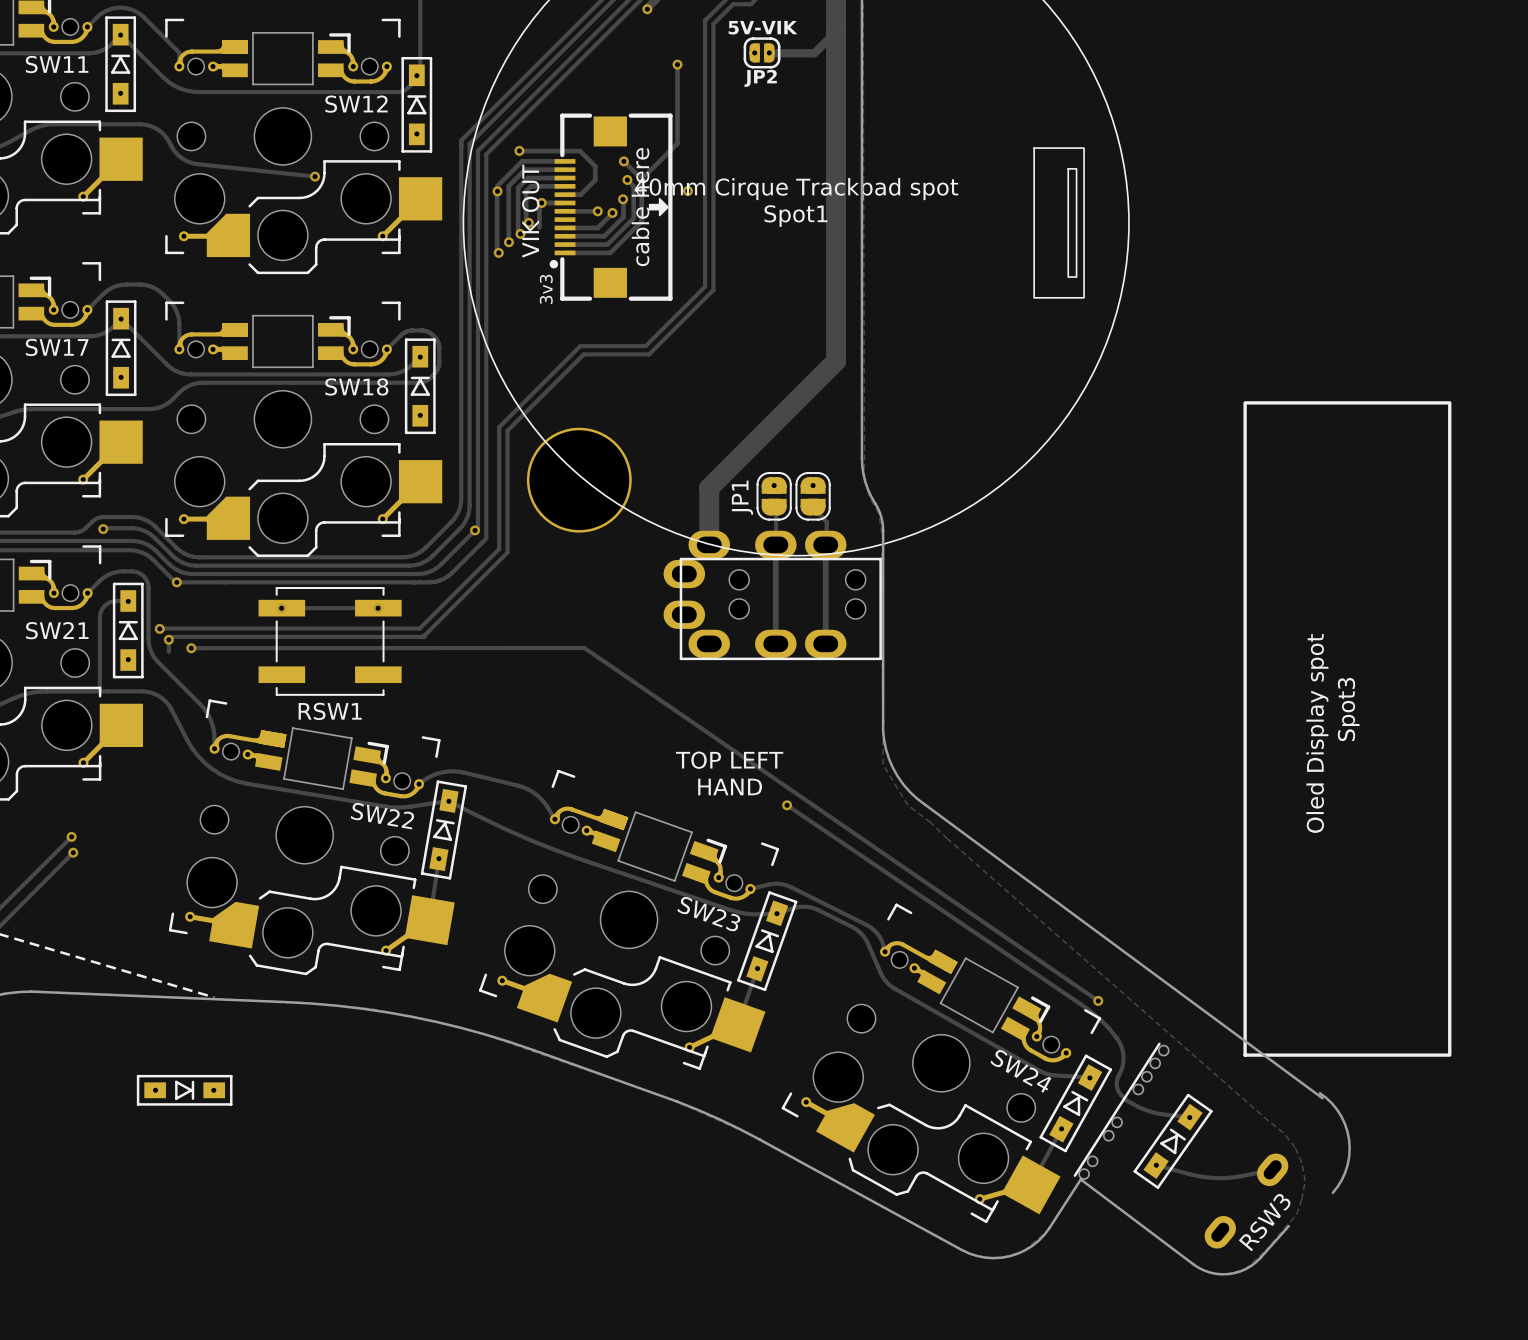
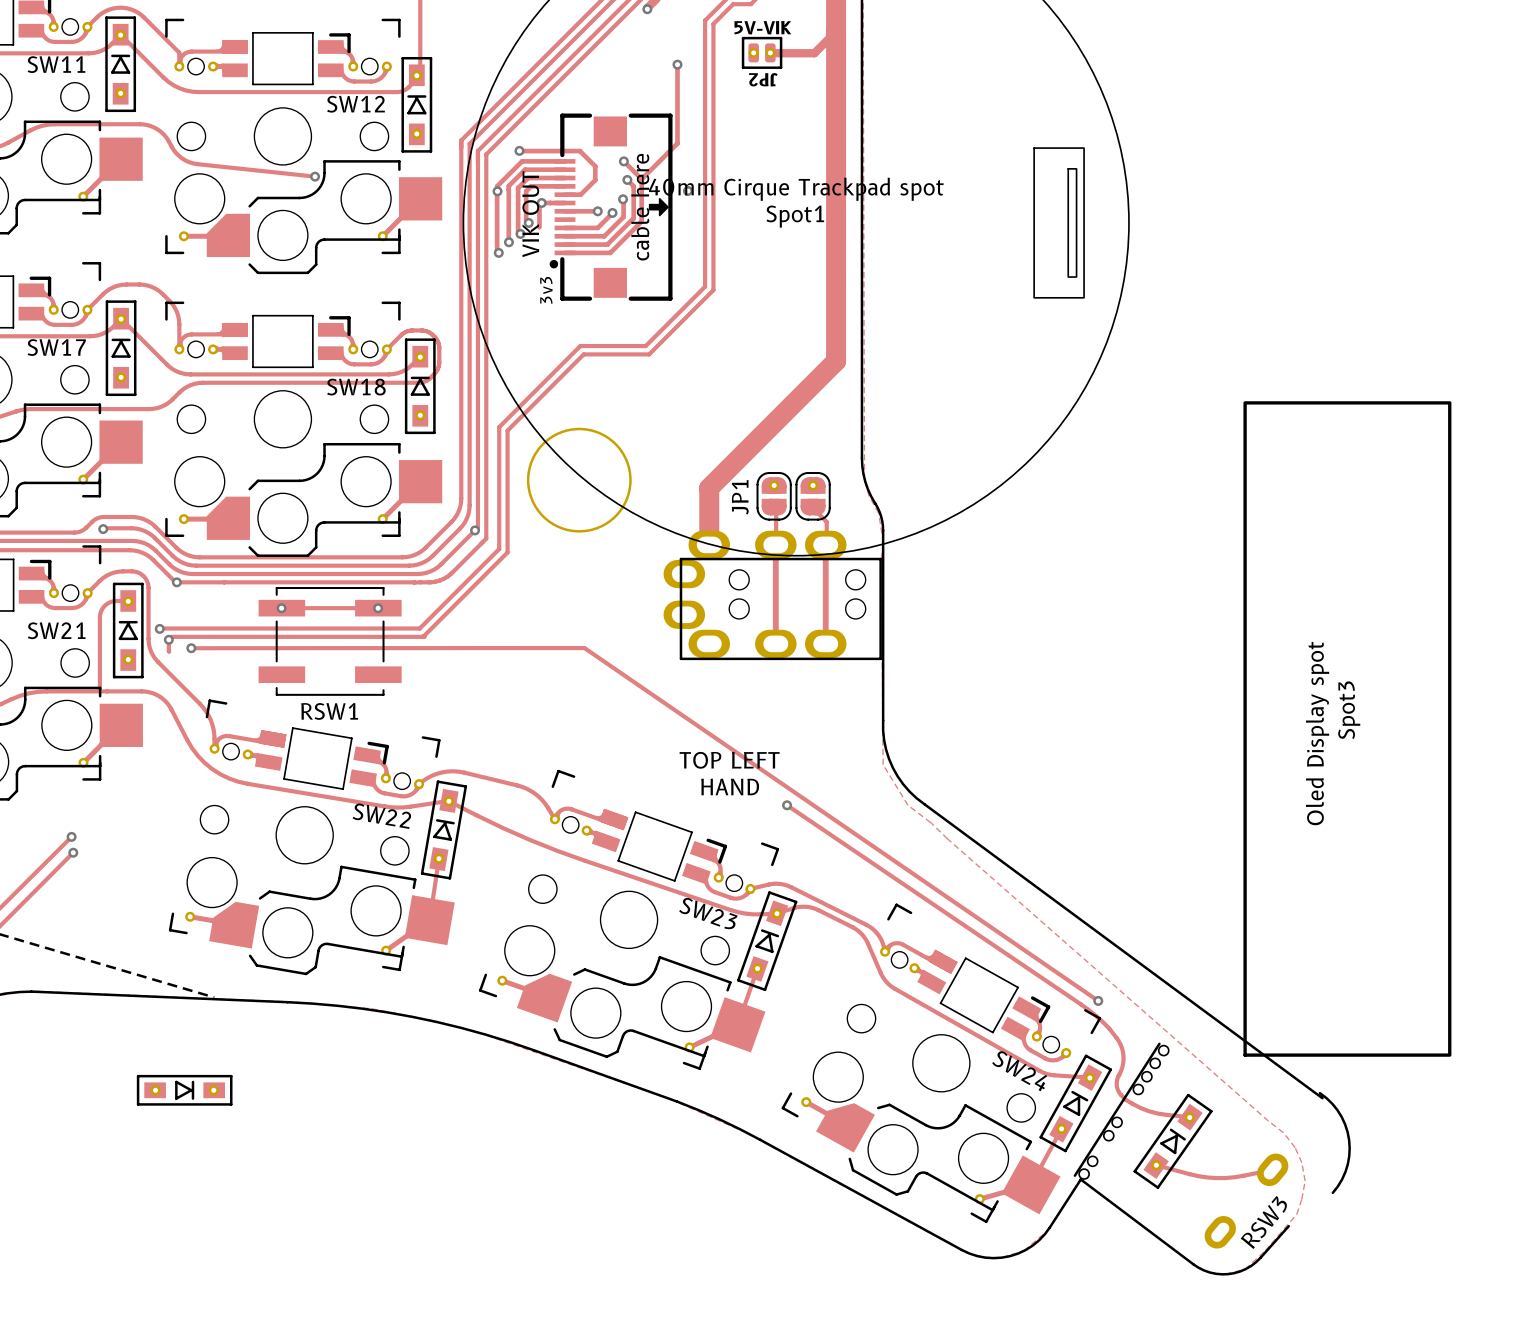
JP2 footprint: [743, 37, 781, 69] -> [741, 36, 783, 69]
JP2 name rotation: 0° (760, 78) -> 180° (763, 79)

